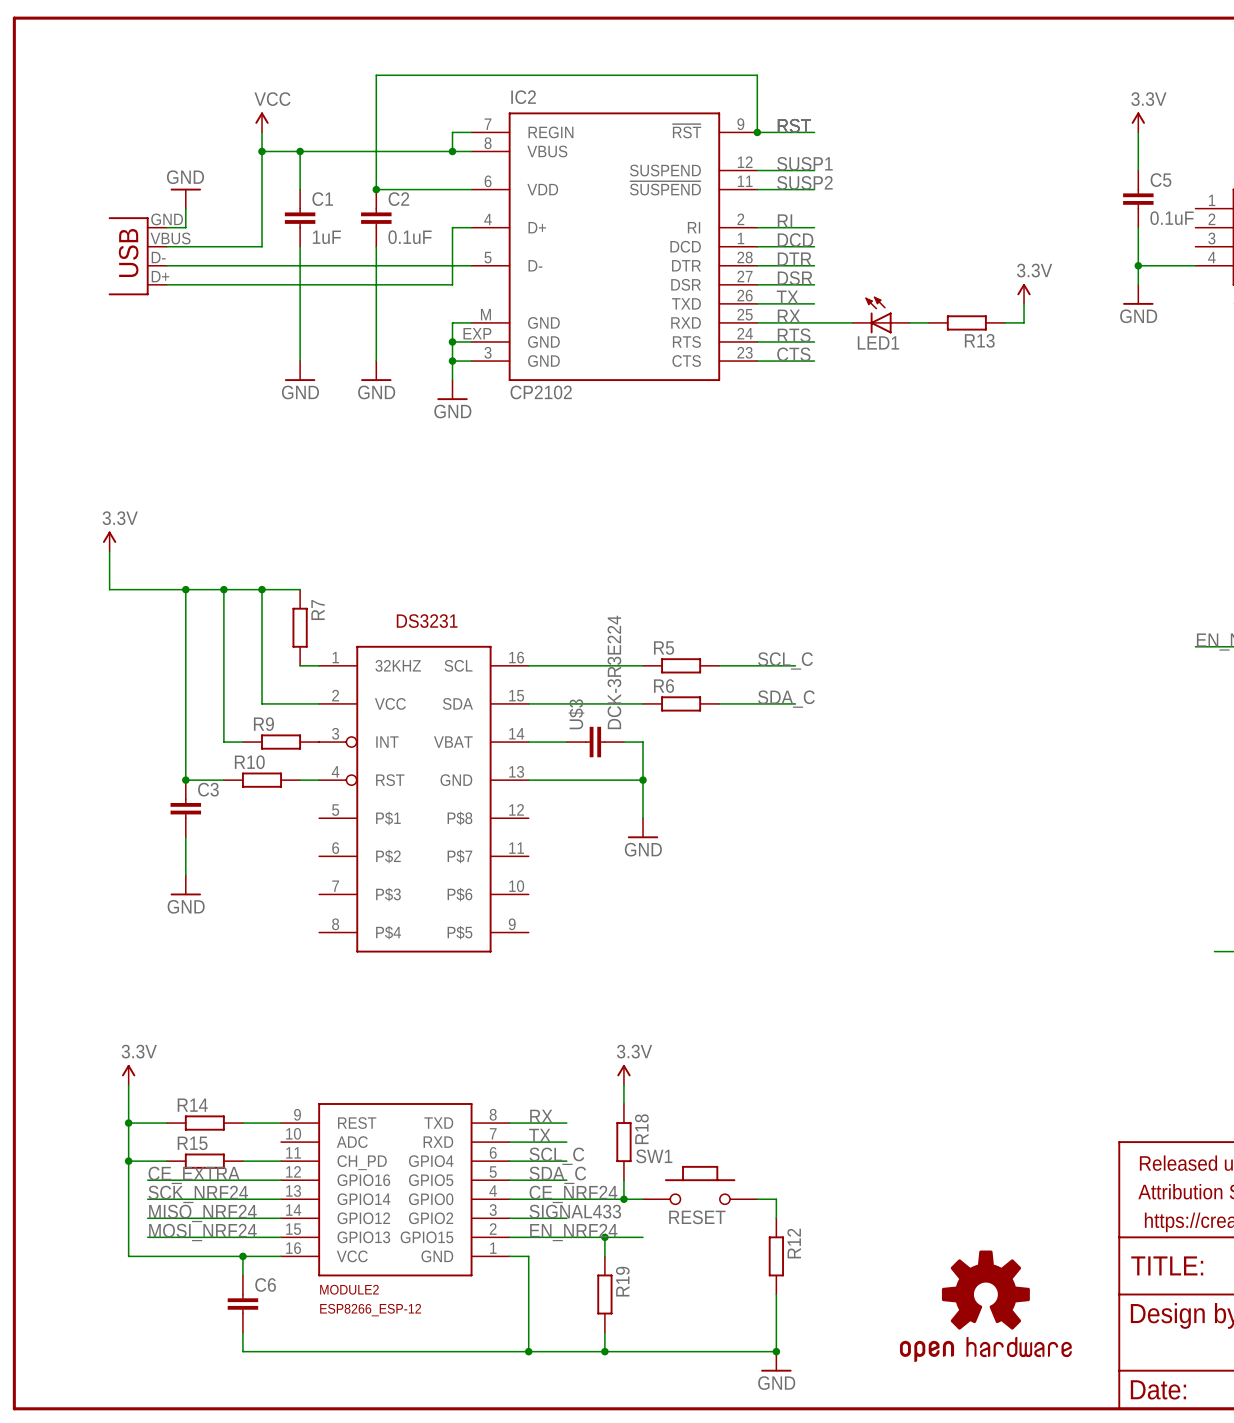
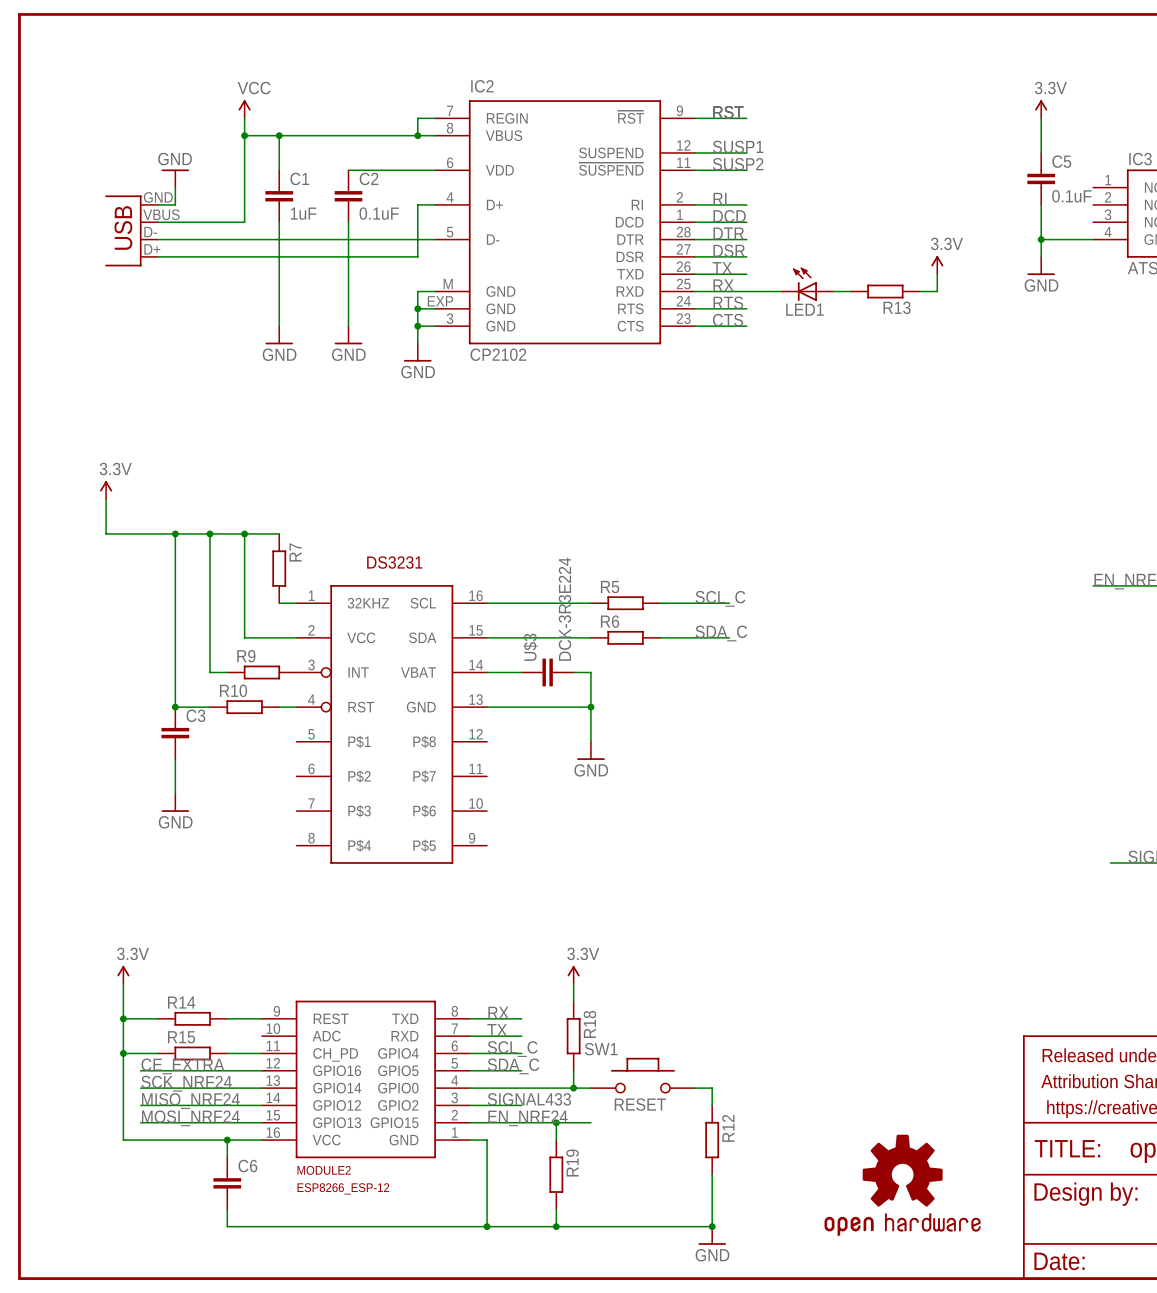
wire: (757, 132) (757, 75) (376, 75) (376, 189) -> none
junction: (757, 132) -> none
junction: (376, 189) -> none
label: CE_NRF24 (573, 1194) -> none

